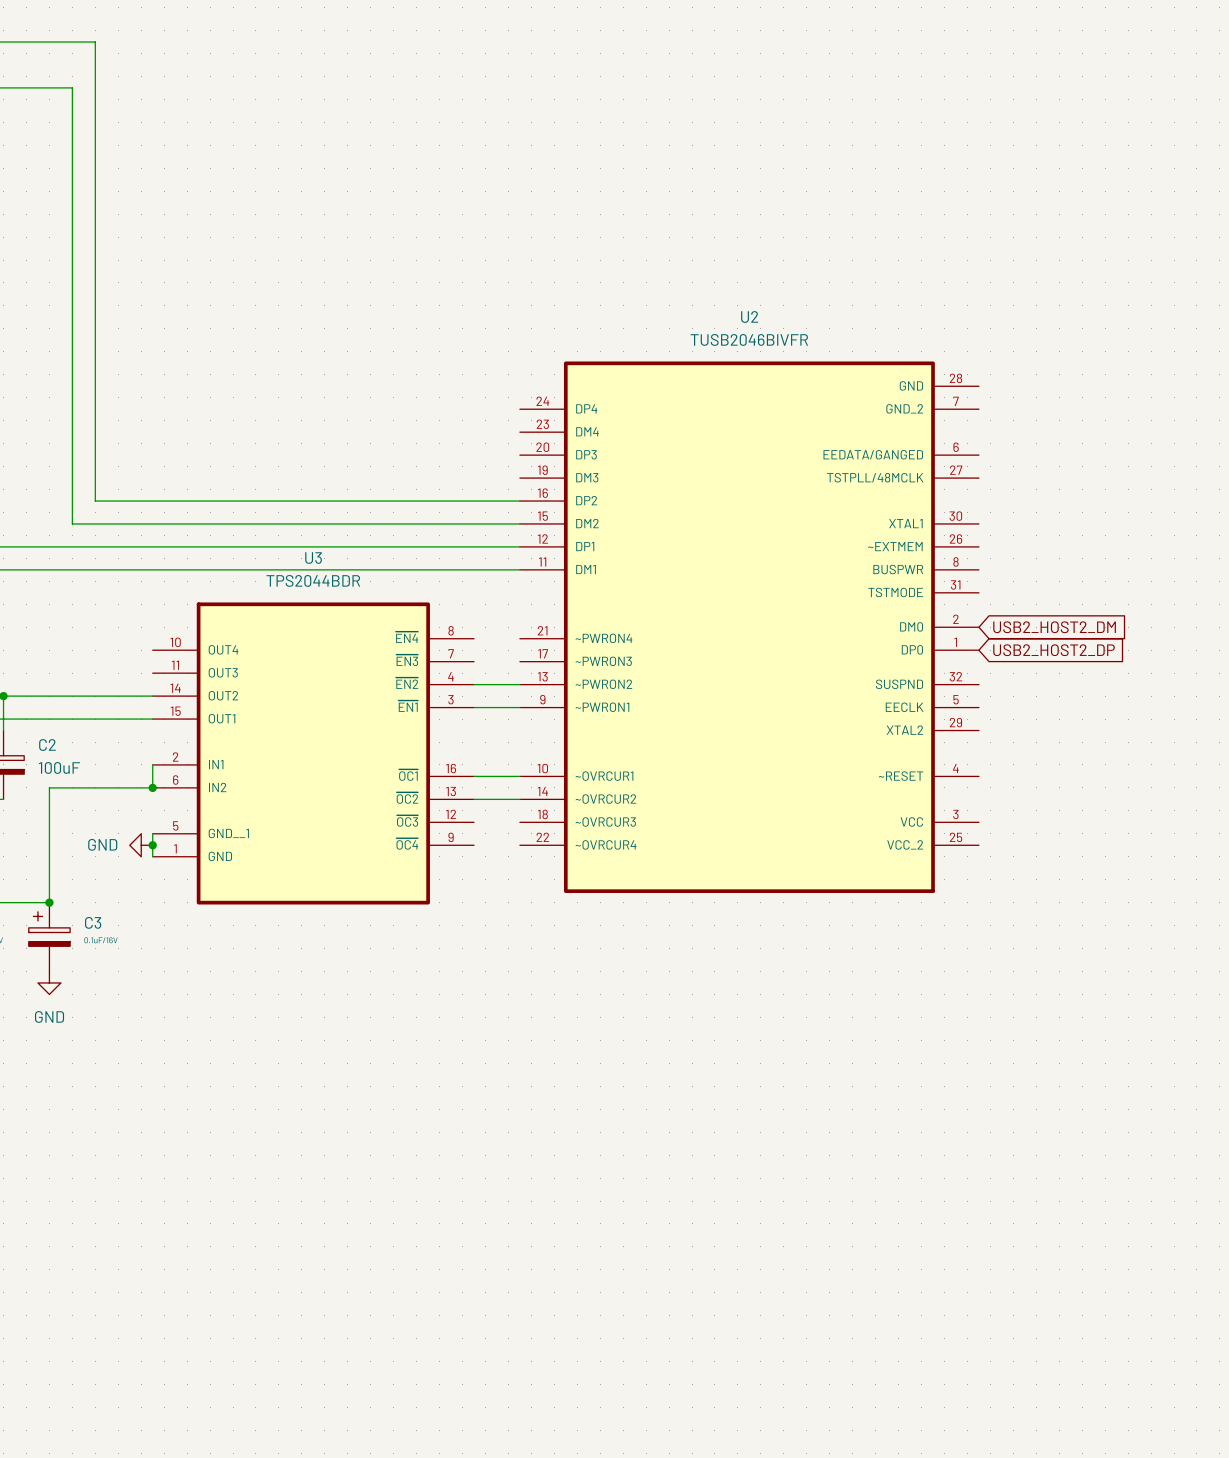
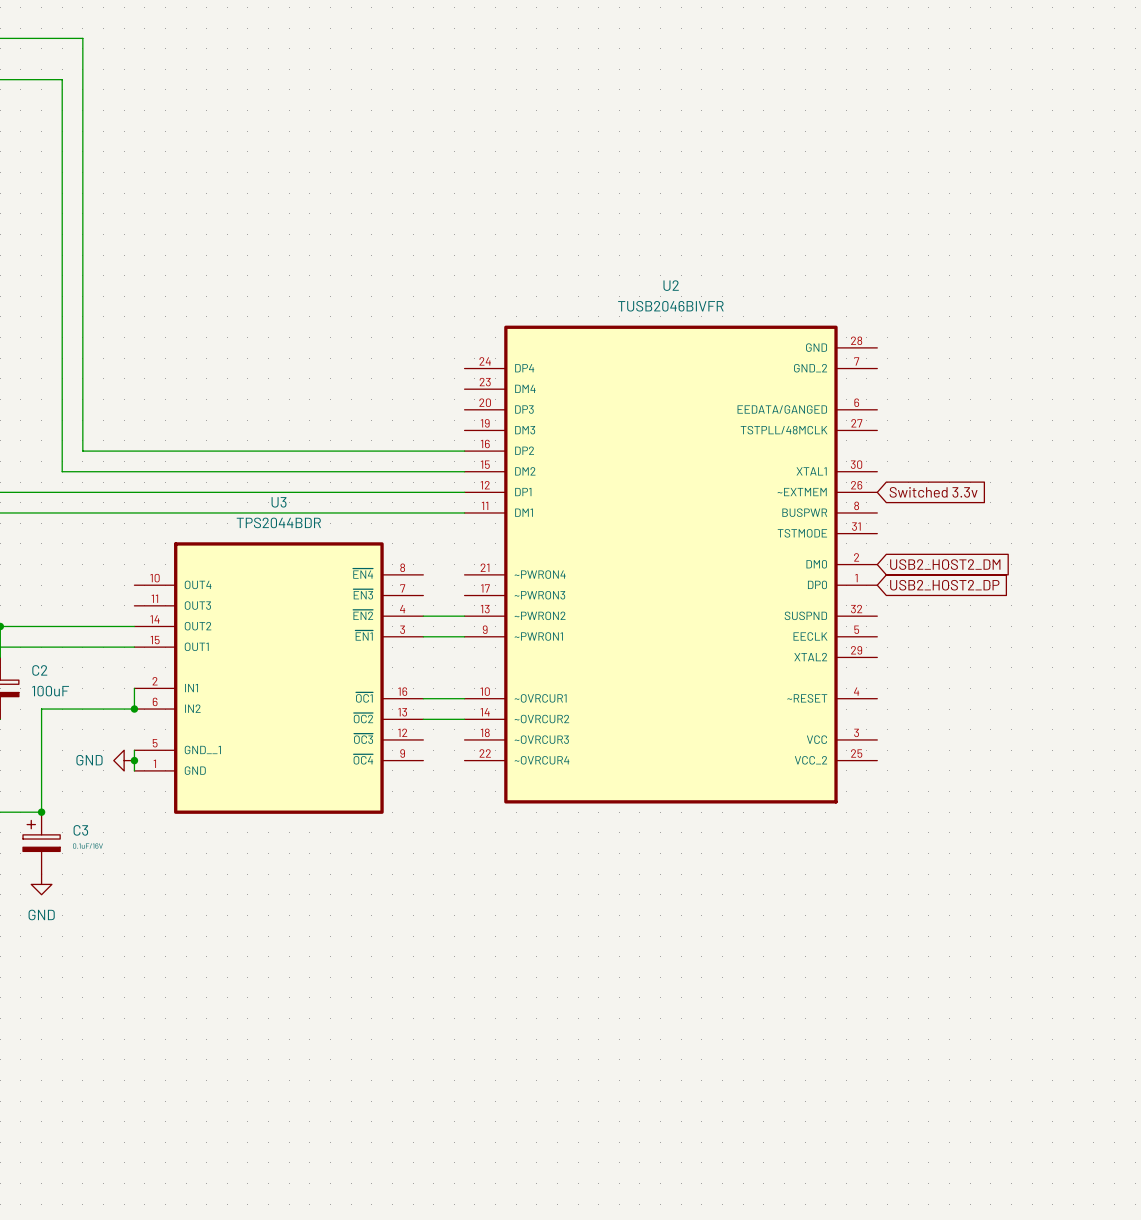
global label: none -> Switched 3.3v (933, 492)

